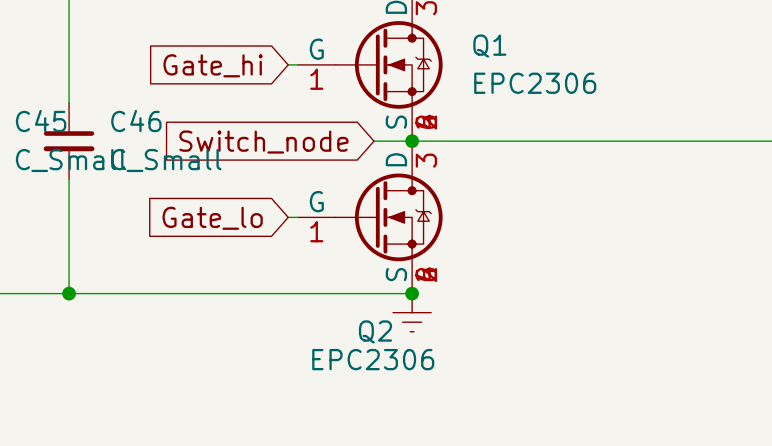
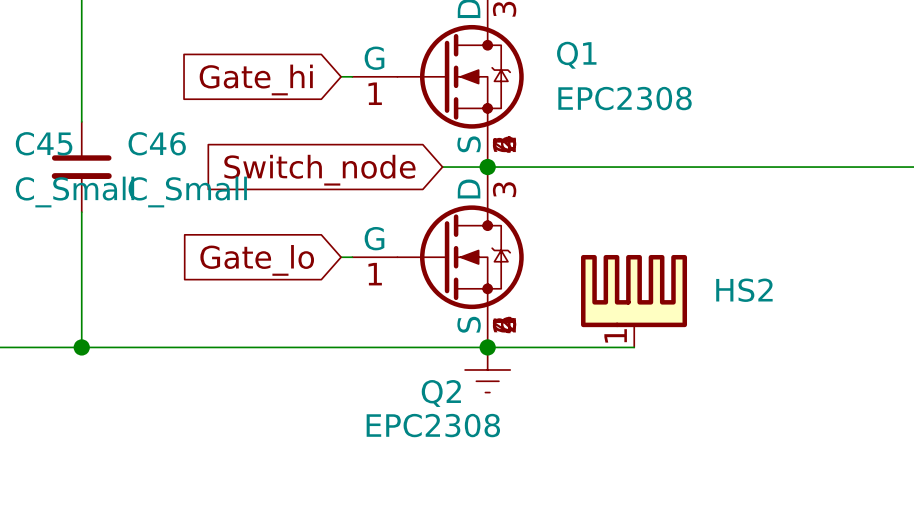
Q1 value: EPC2306 (535, 83) -> EPC2308 (625, 98)
HS2: none -> (634, 301)
wire: none -> (487, 347) (634, 347)
Q2 value: EPC2306 (373, 359) -> EPC2308 (433, 425)

